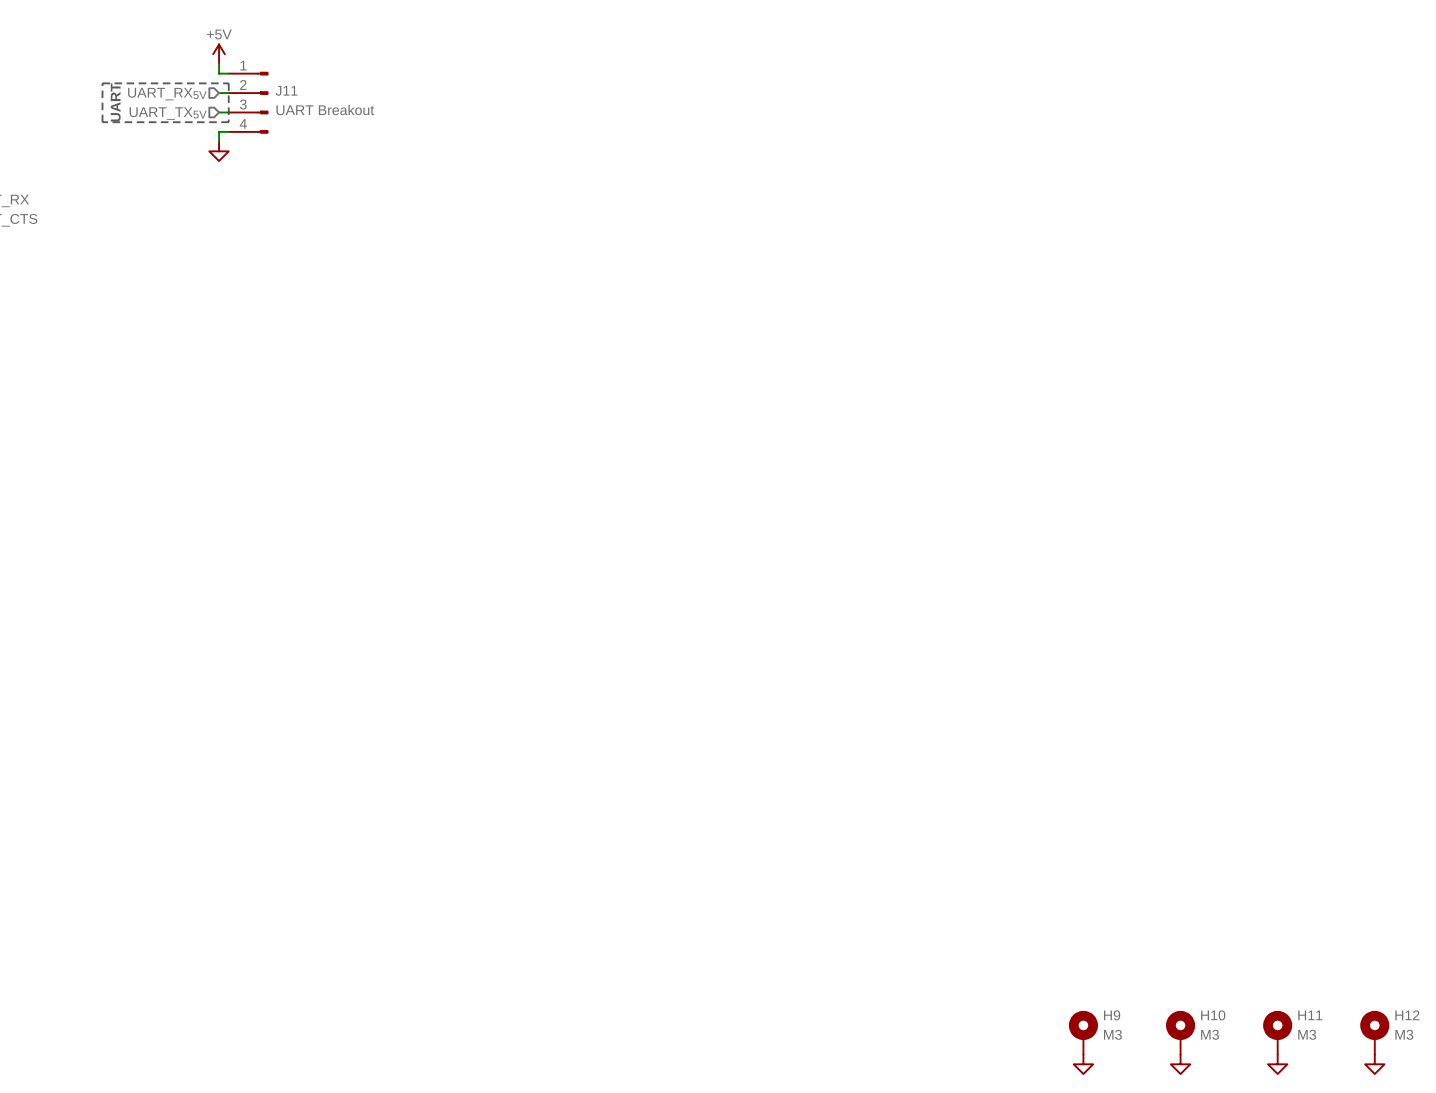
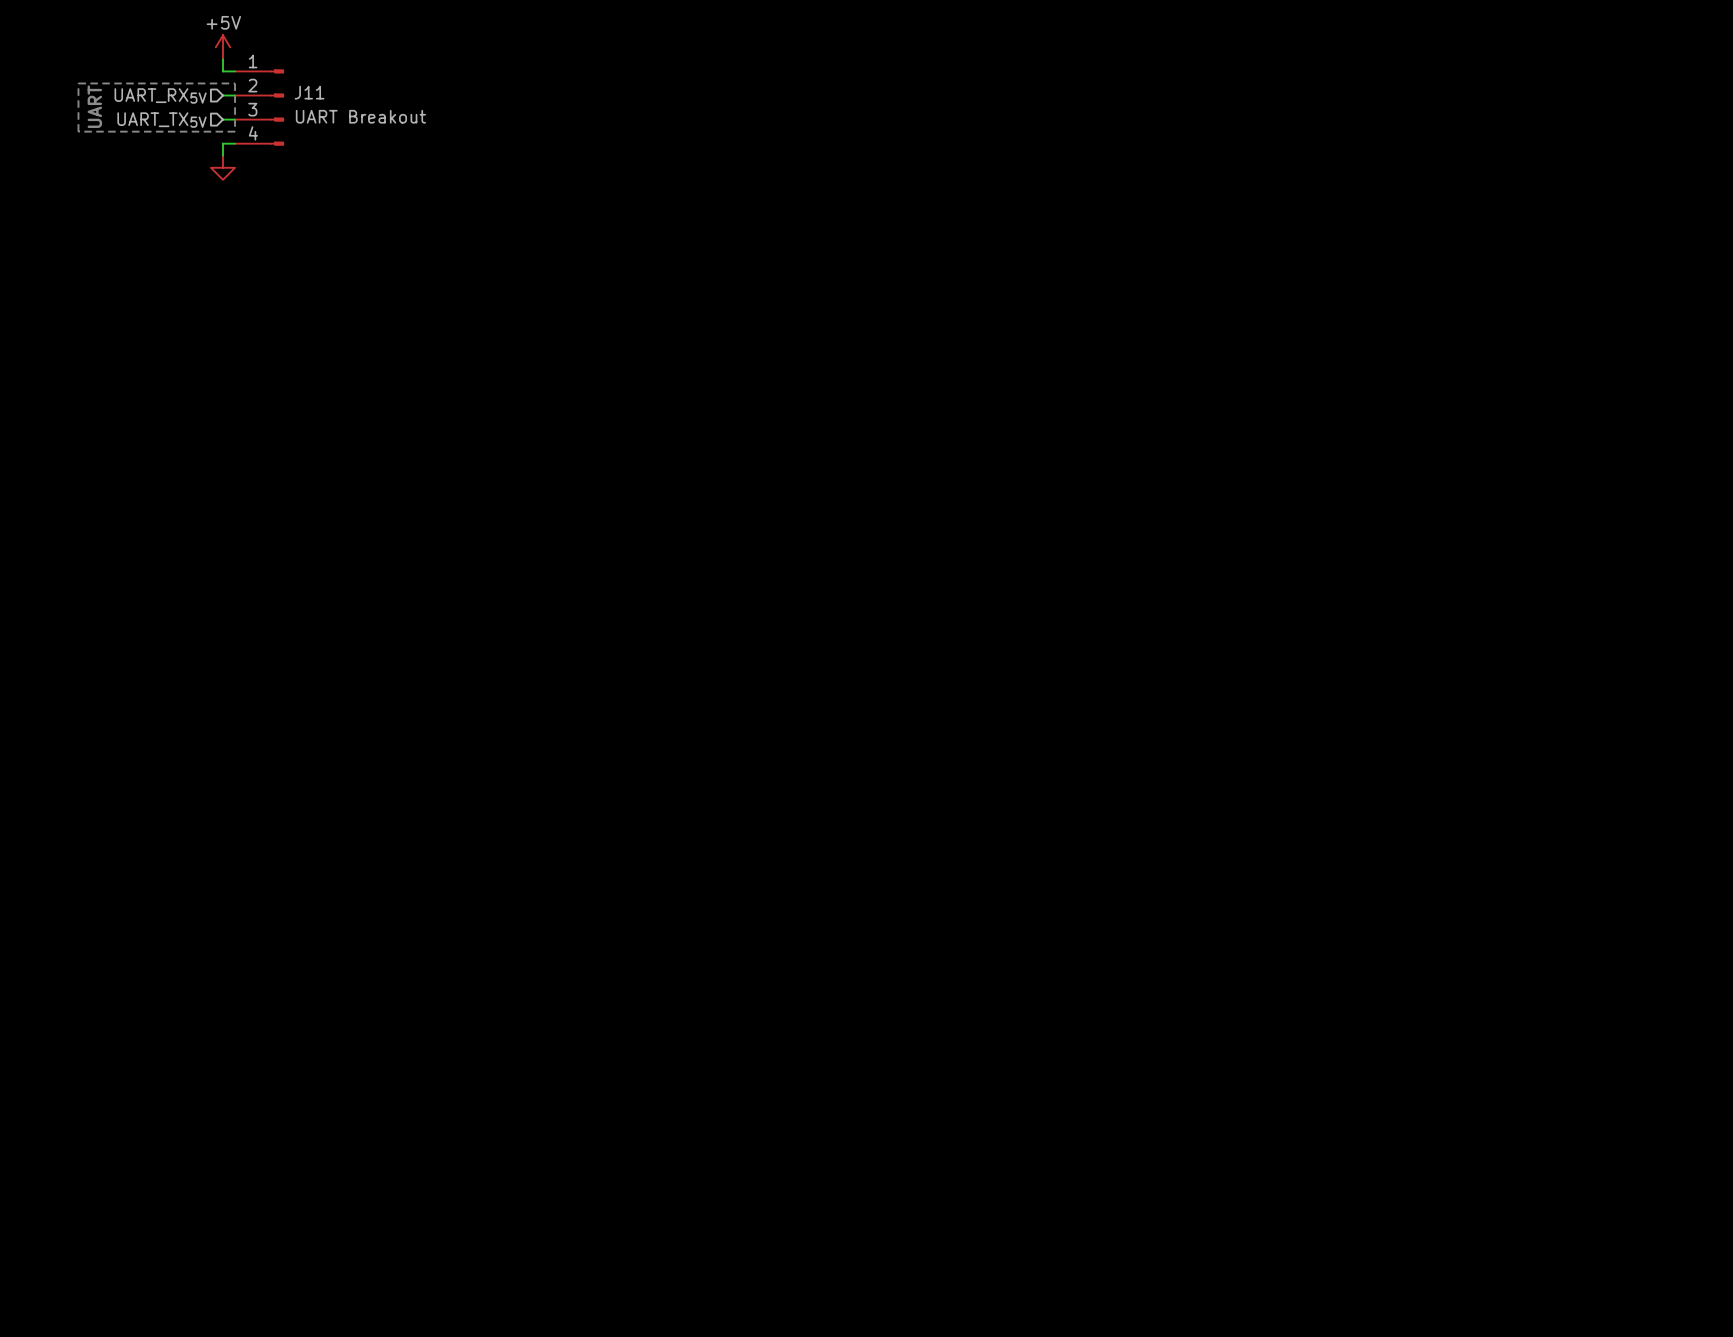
H9: M3 (1083, 1032) -> none
H10: M3 (1180, 1032) -> none
H11: M3 (1277, 1032) -> none
H12: M3 (1374, 1032) -> none
power symbol: (1083, 1064) -> none
power symbol: (1180, 1064) -> none
power symbol: (1277, 1064) -> none
power symbol: (1374, 1064) -> none

